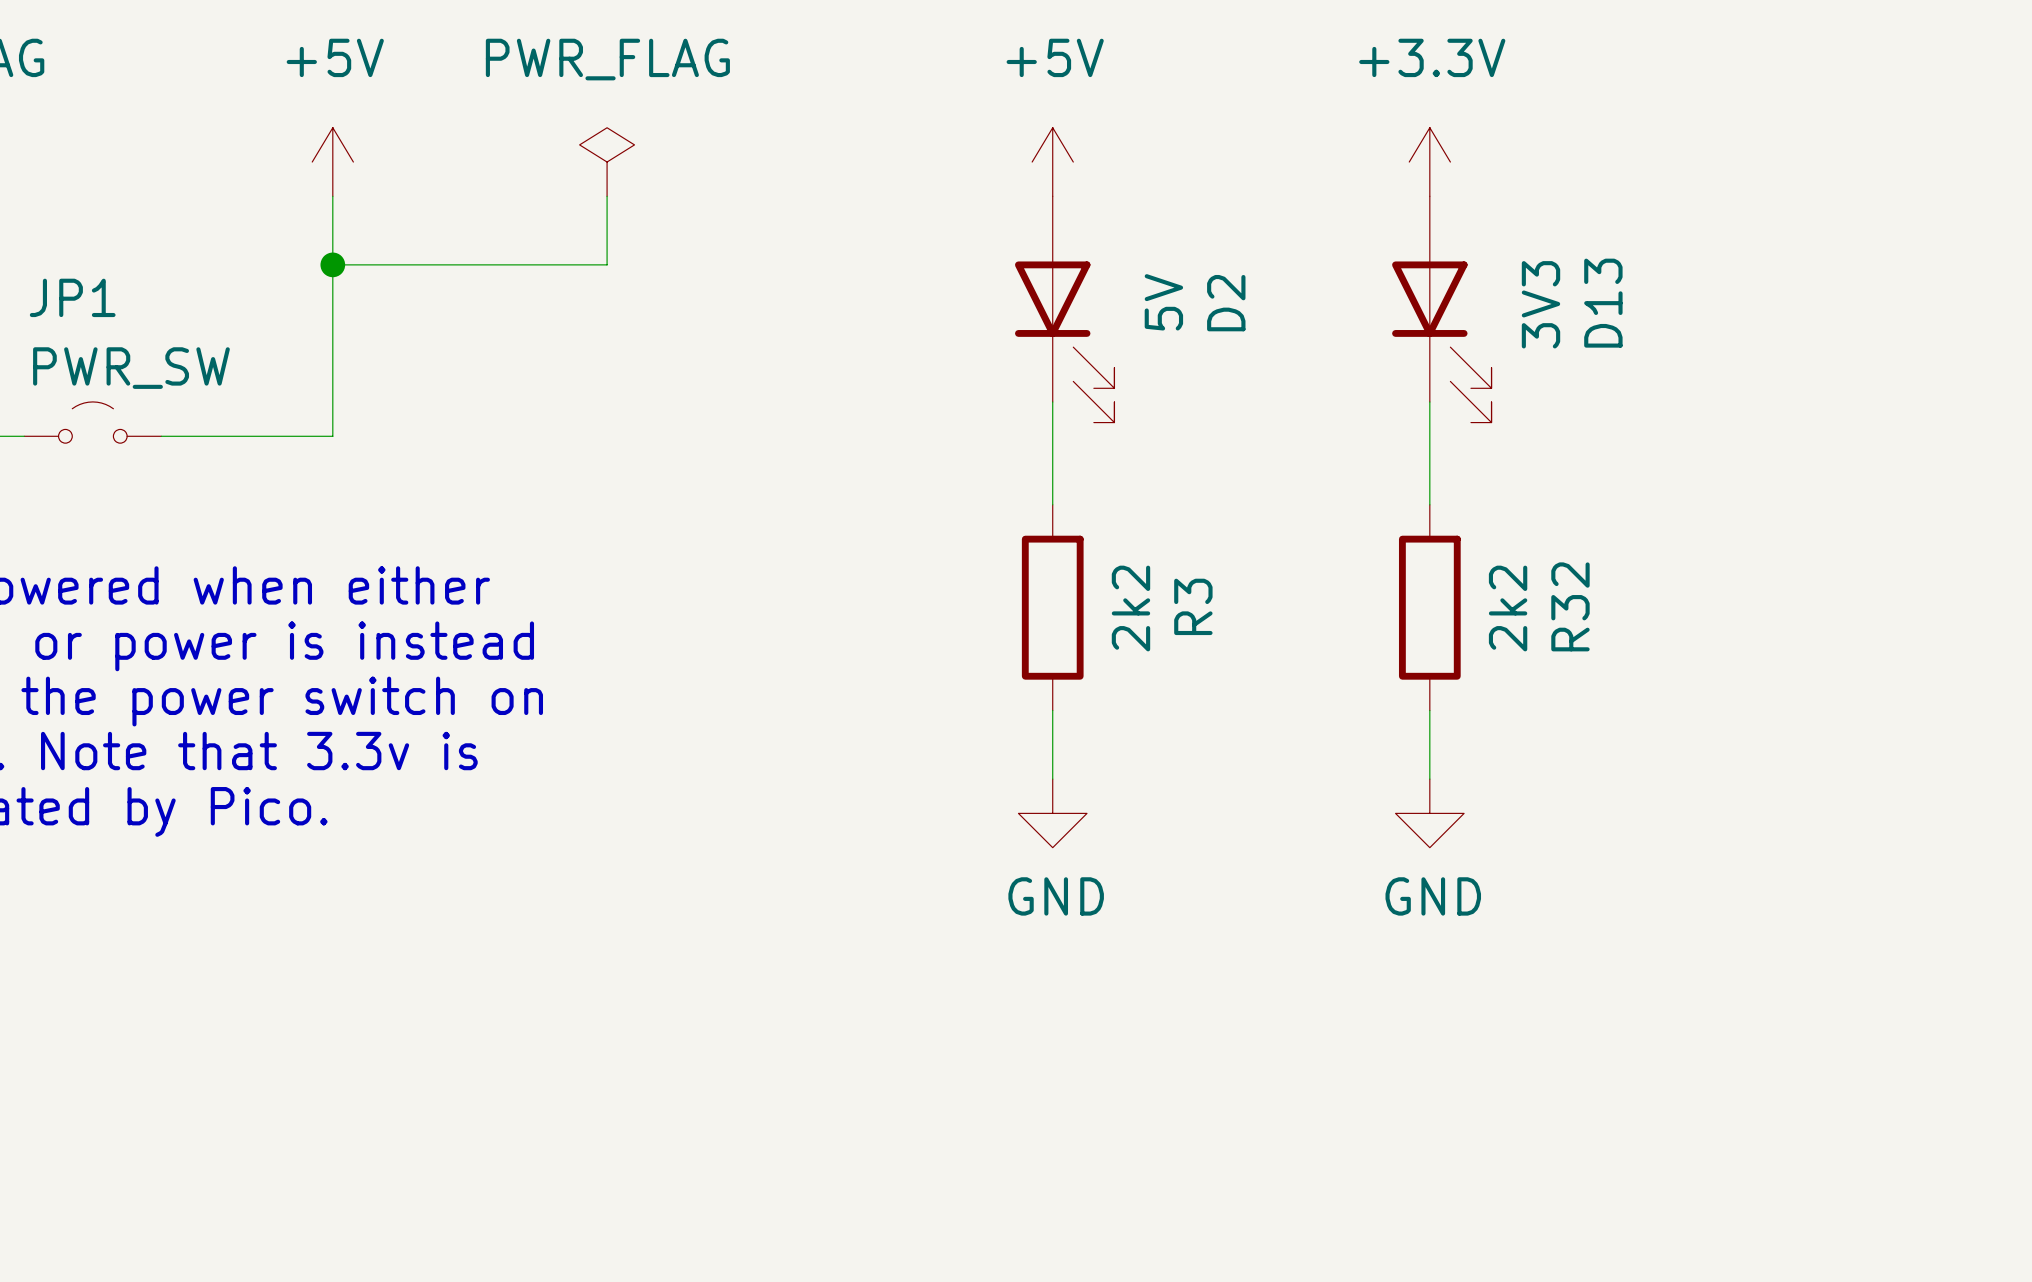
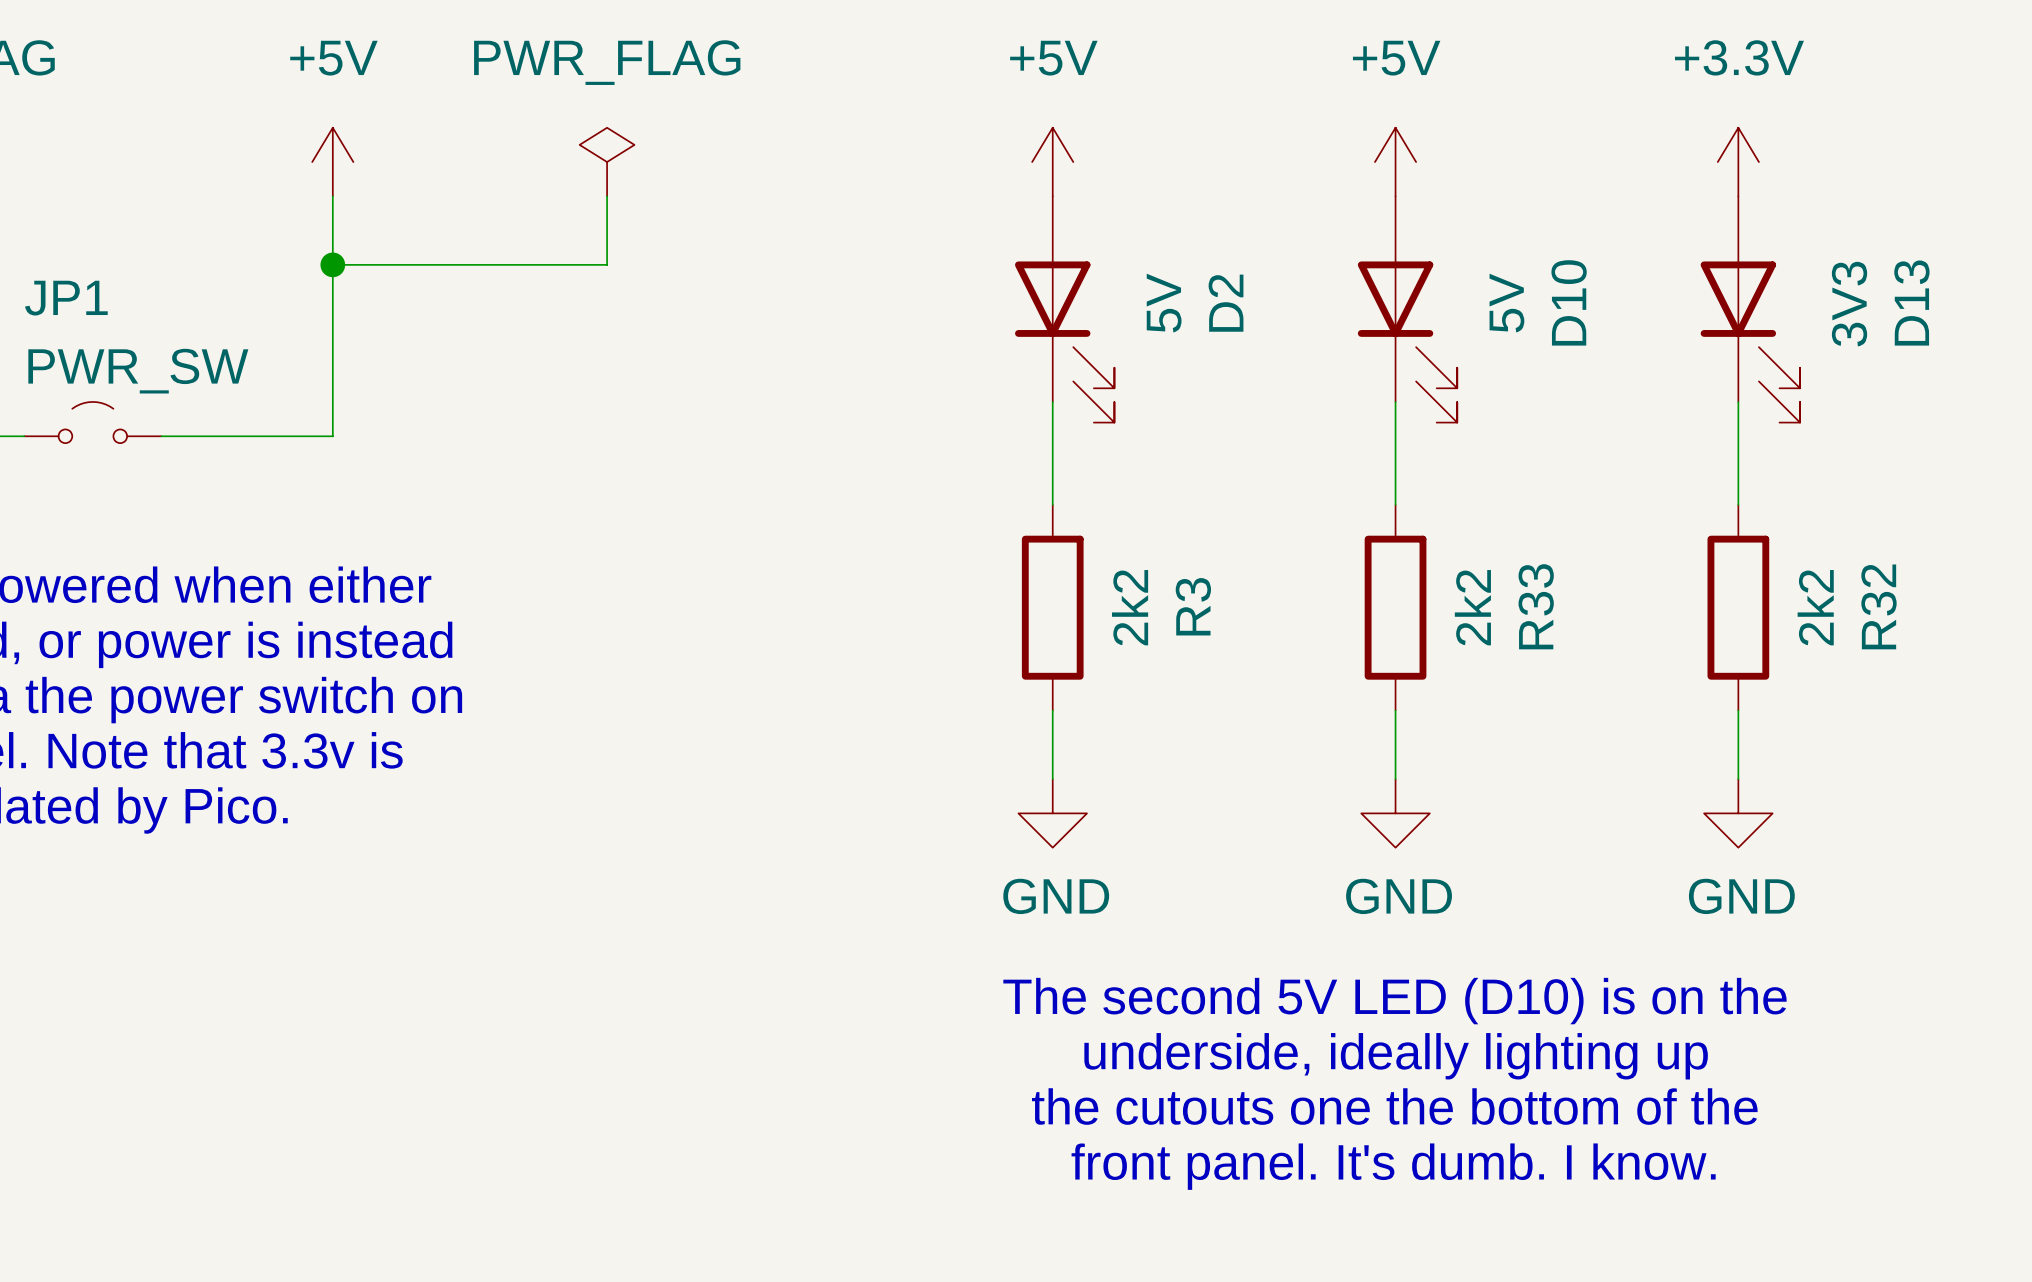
power symbol: none -> +5V (1395, 162)
power symbol position: +3.3V (1429, 162) -> +3.3V (1738, 162)
D10: none -> 5V (1407, 309)
D13 position: (1441, 309) -> (1750, 309)
wire: (1429, 402) (1429, 504) -> (1395, 402) (1395, 504)
wire: none -> (1738, 402) (1738, 504)
R33: none -> 2k2 (1395, 607)
R32 position: (1429, 607) -> (1738, 607)
wire: (1429, 710) (1429, 779) -> (1395, 710) (1395, 779)
wire: none -> (1738, 710) (1738, 779)
power symbol position: GND (1429, 813) -> GND (1395, 813)
power symbol: none -> GND (1738, 813)
text: none -> The second 5V LED (D10) is on the (1395, 1001)
text: none -> underside, ideally lighting up (1396, 1056)
text: none -> the cutouts one the bottom of the (1394, 1106)
text: none -> front panel. It's dumb. I know. (1393, 1166)

